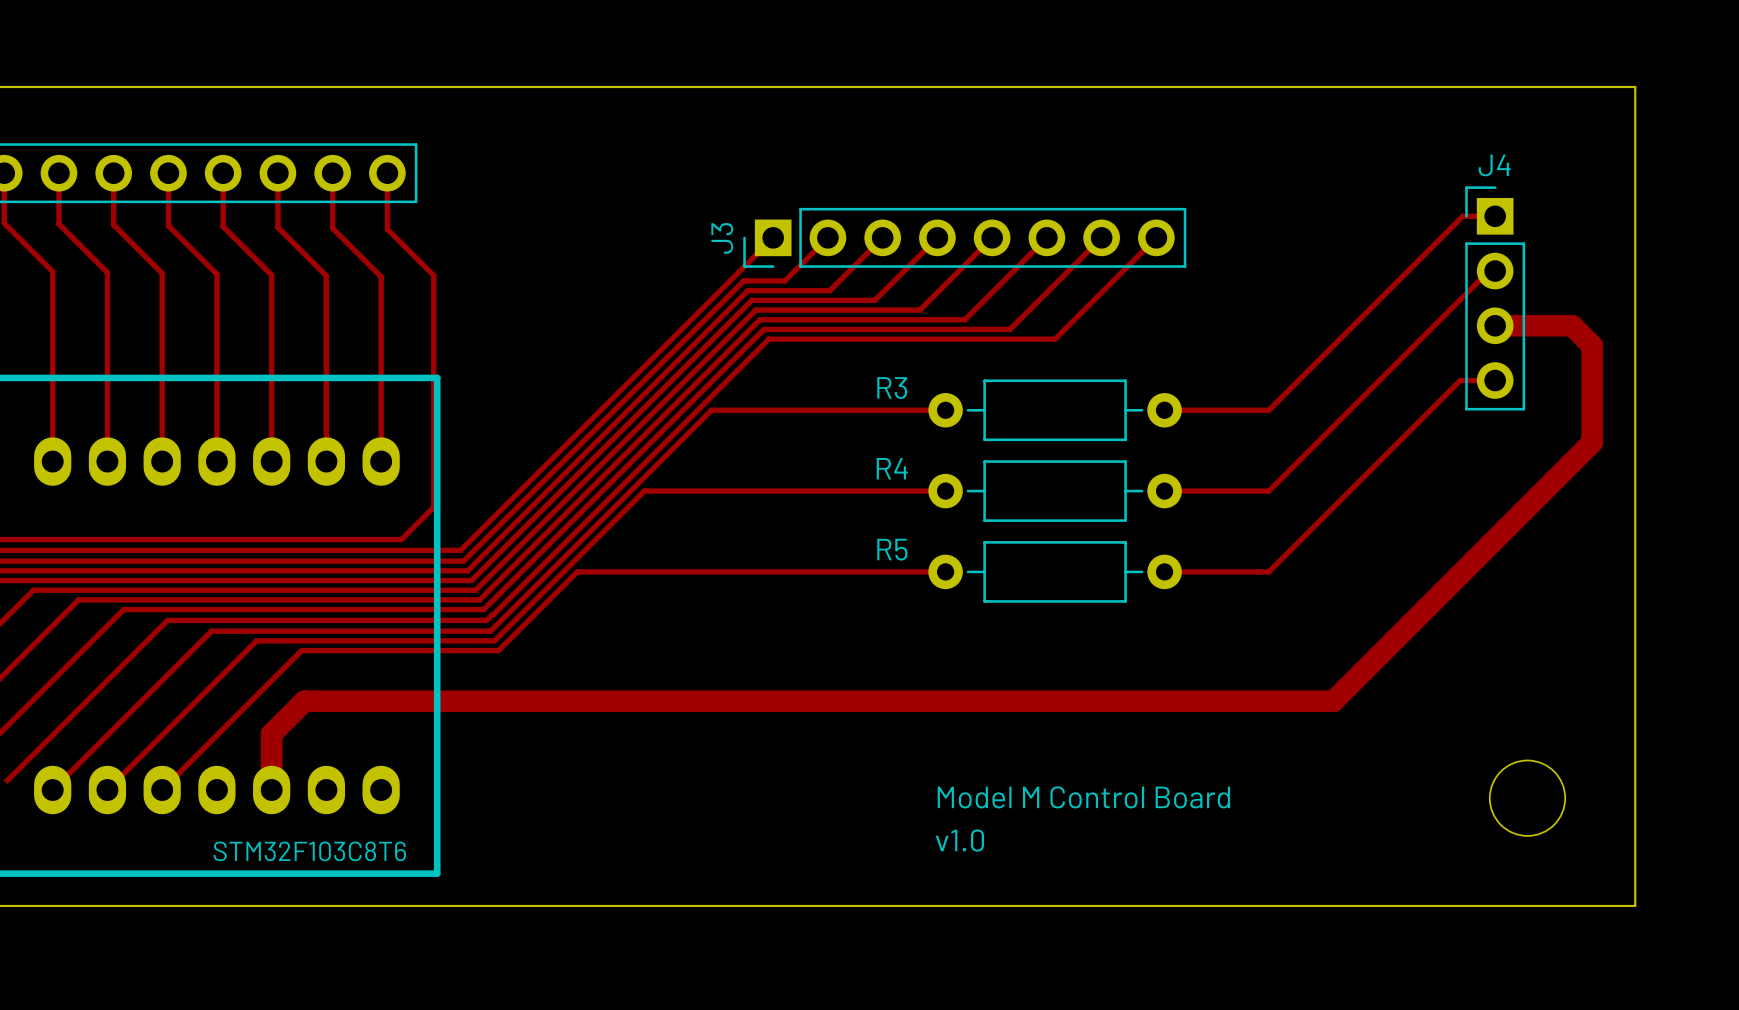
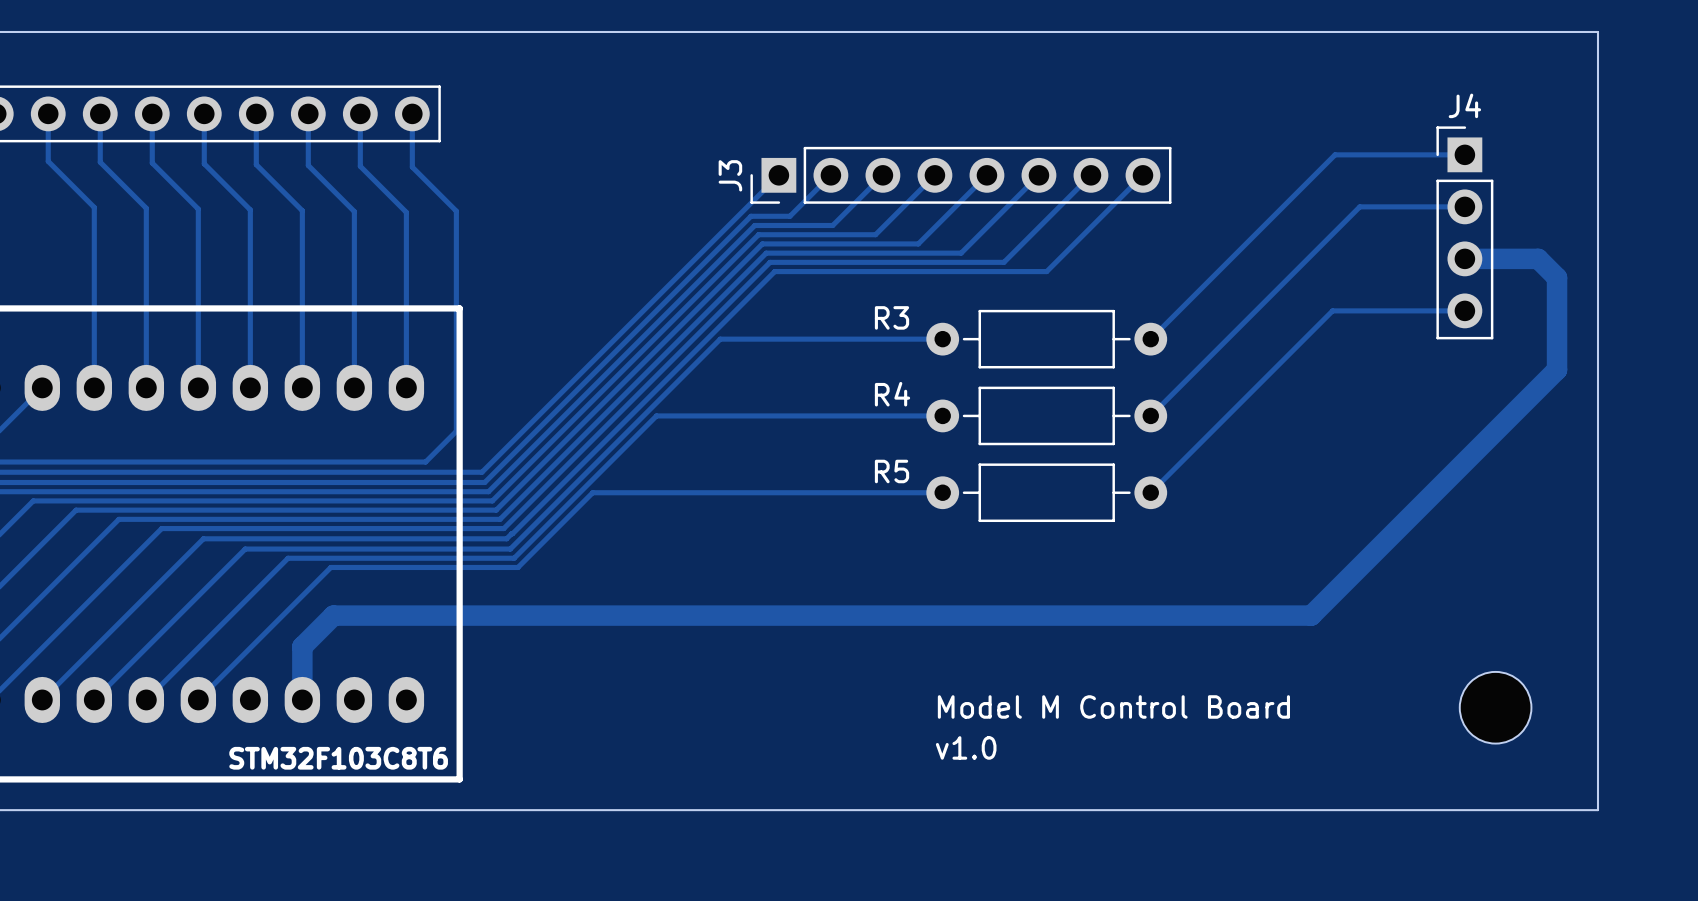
track: (1462, 216) (1268, 410) (1164, 410) -> (1434, 154) (1335, 154) (1150, 339)
track: (1488, 271) (1268, 491) (1164, 491) -> (1458, 206) (1359, 206) (1150, 415)
track: (1460, 380) (1268, 571) (1164, 571) -> (1431, 310) (1332, 310) (1150, 492)

